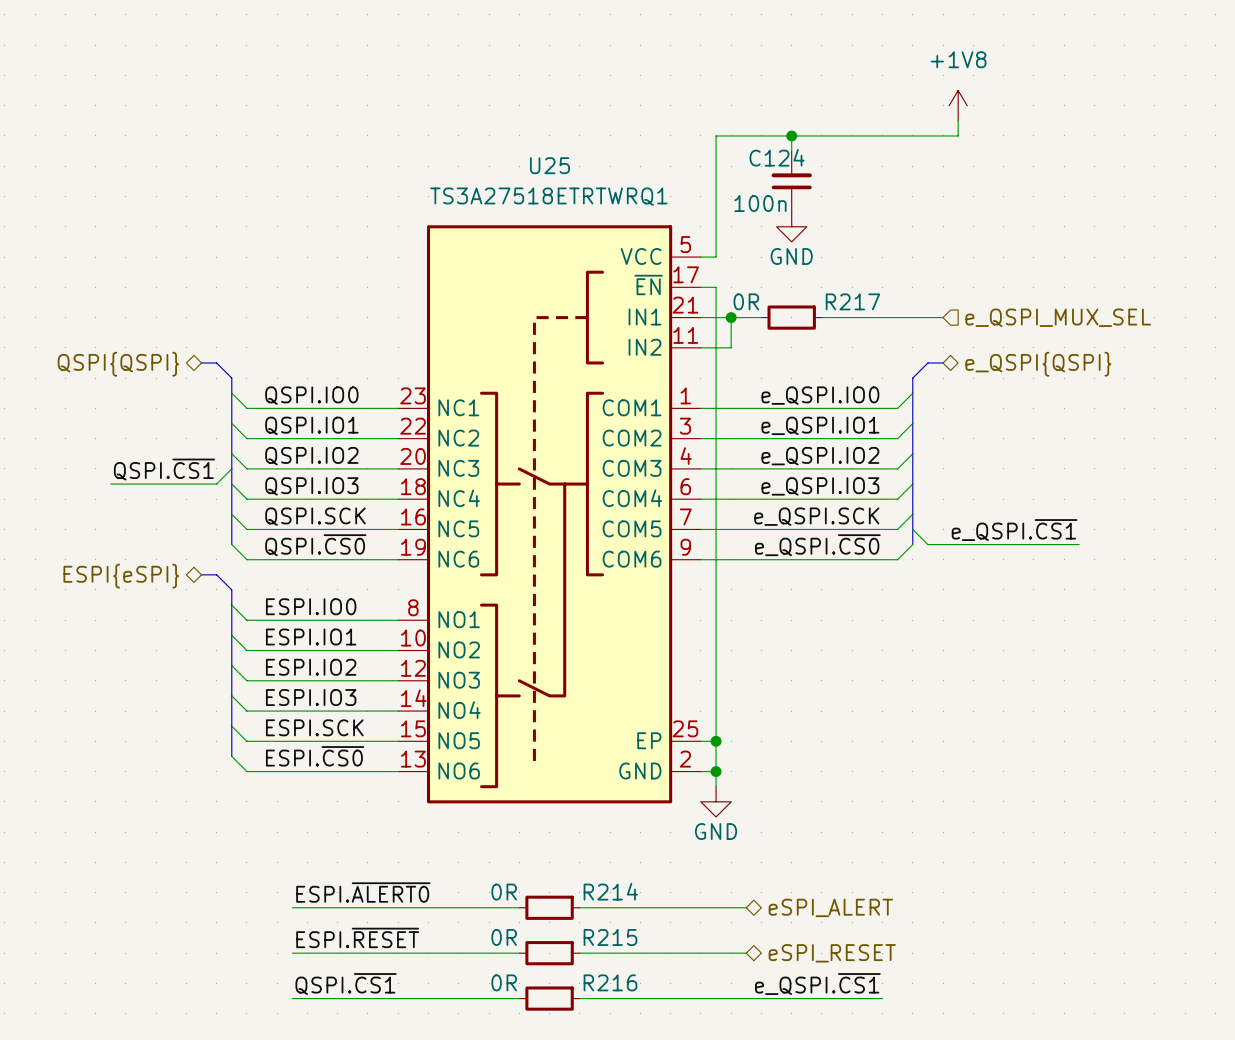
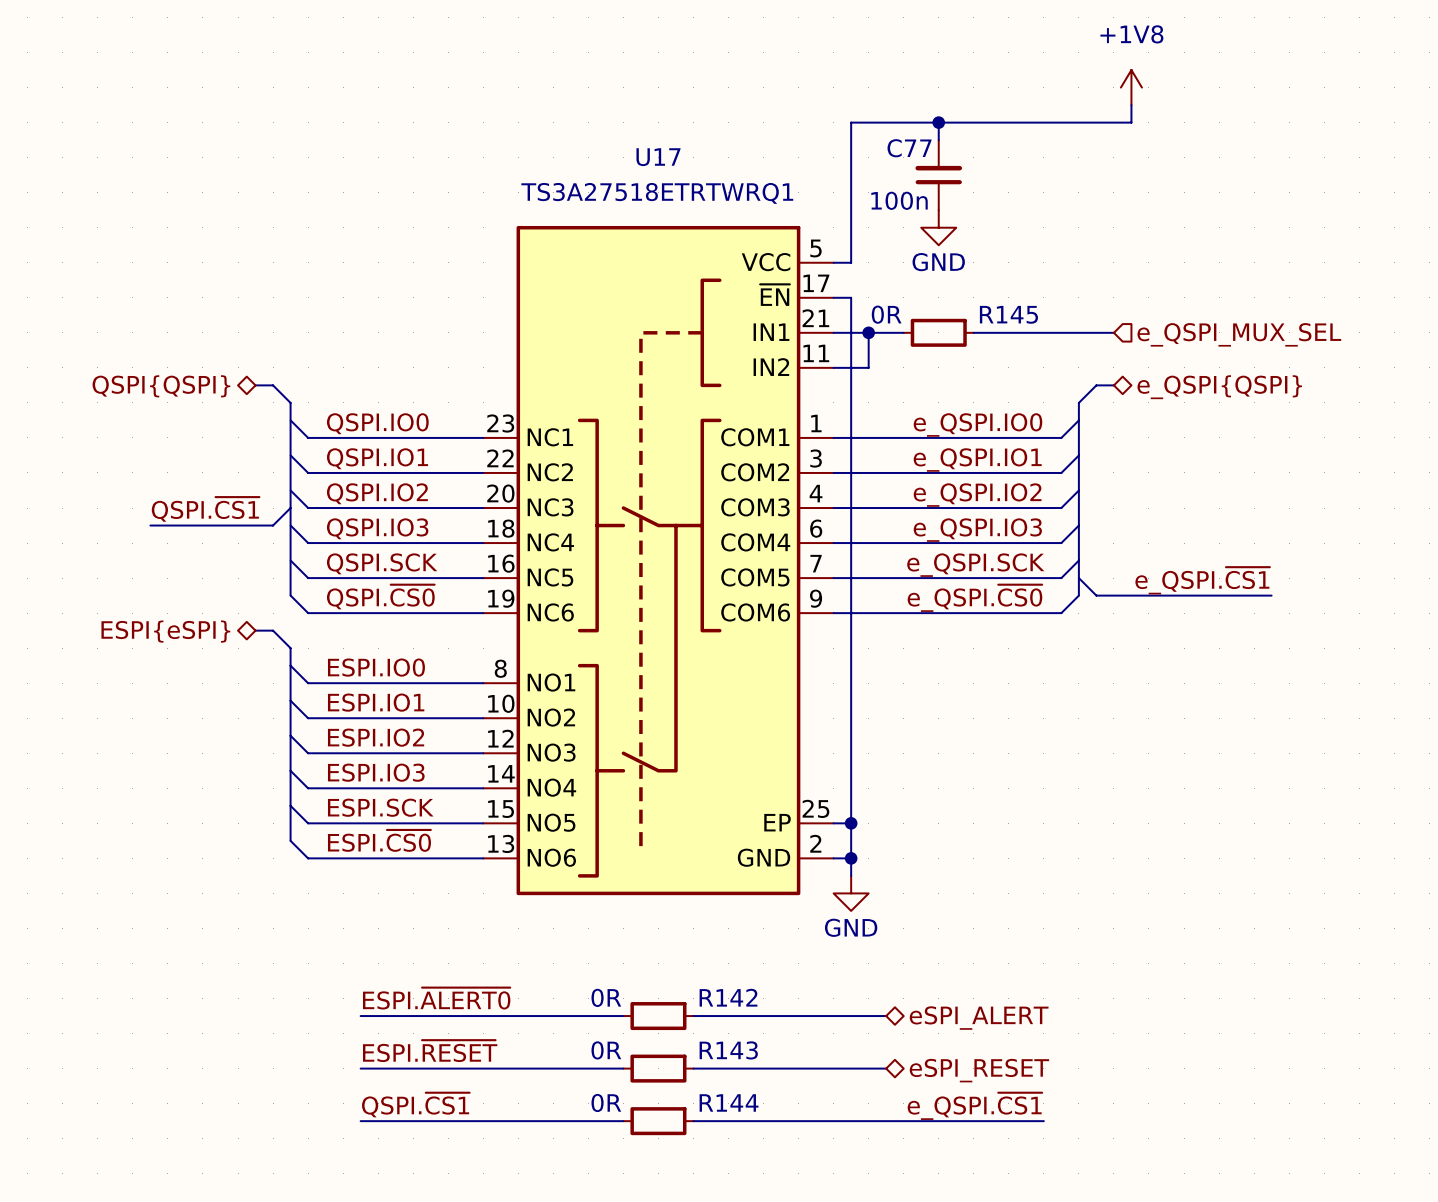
C124 name: C124 (777, 157) -> C77 (909, 148)
U25 name: U25 (549, 165) -> U17 (658, 157)
R217 name: R217 (852, 301) -> R145 (1008, 314)
R214 name: R214 (610, 891) -> R142 (728, 997)
R215 name: R215 (610, 937) -> R143 (728, 1050)
R216 name: R216 (610, 982) -> R144 (729, 1102)

